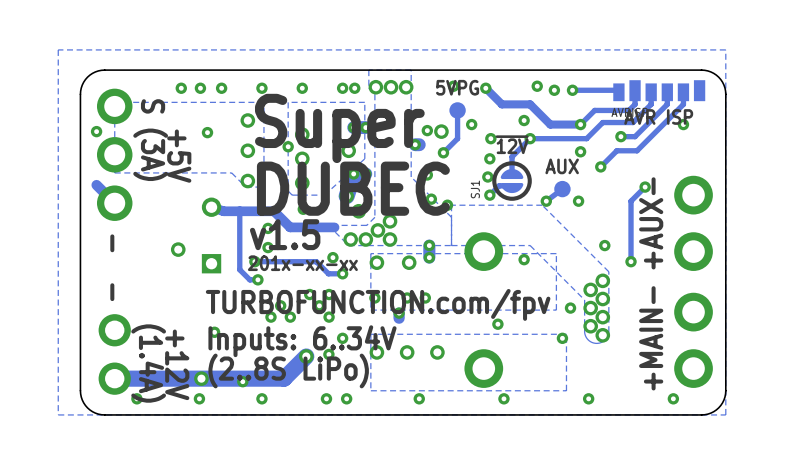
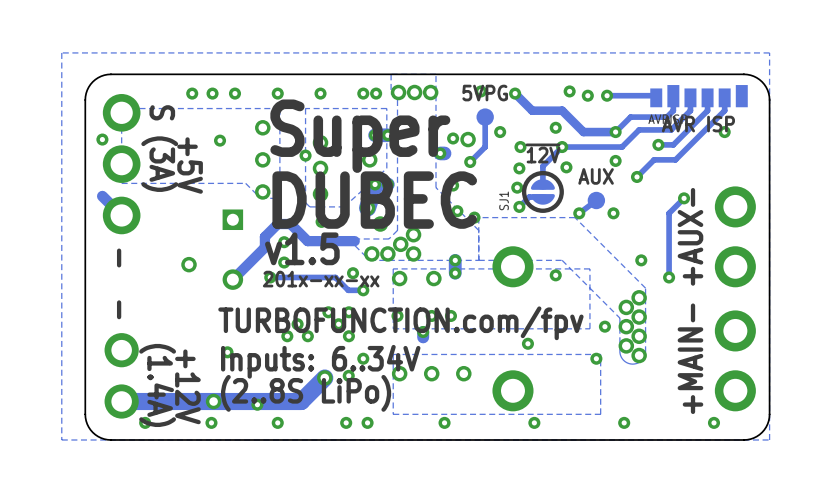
via: none -> (566, 167)
track: (211, 207) (223, 211) (261, 211) -> (232, 279) (264, 247) (264, 236) (277, 224)
track: (239, 211) (239, 269) (249, 279) (257, 279) -> none
part rotation: 0° (211, 235) -> 180° (232, 249)
via: (257, 279) -> none

